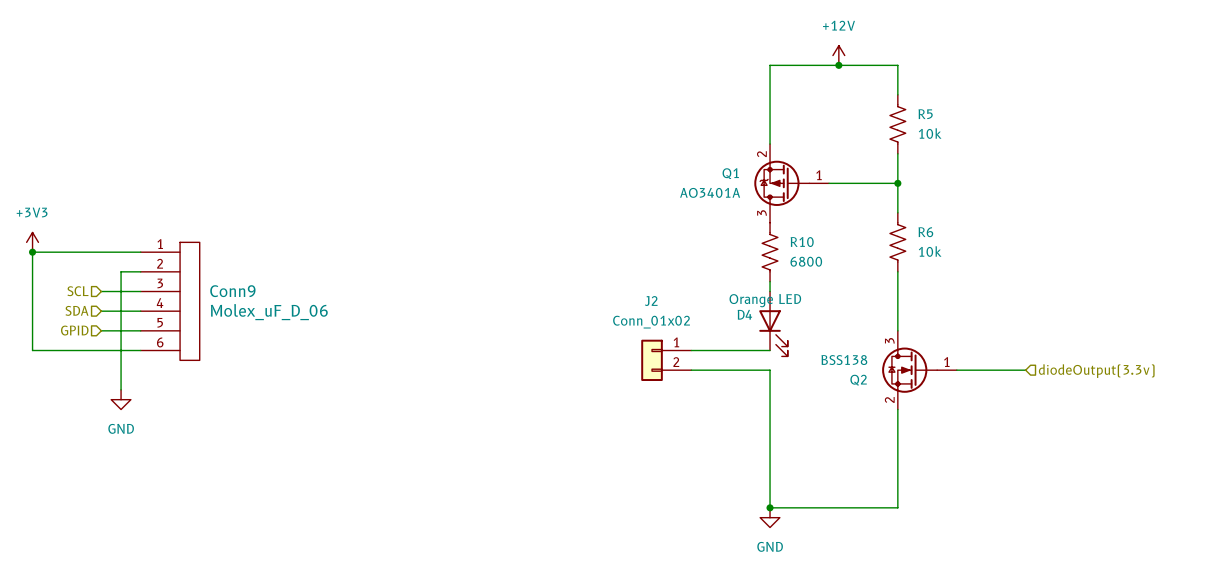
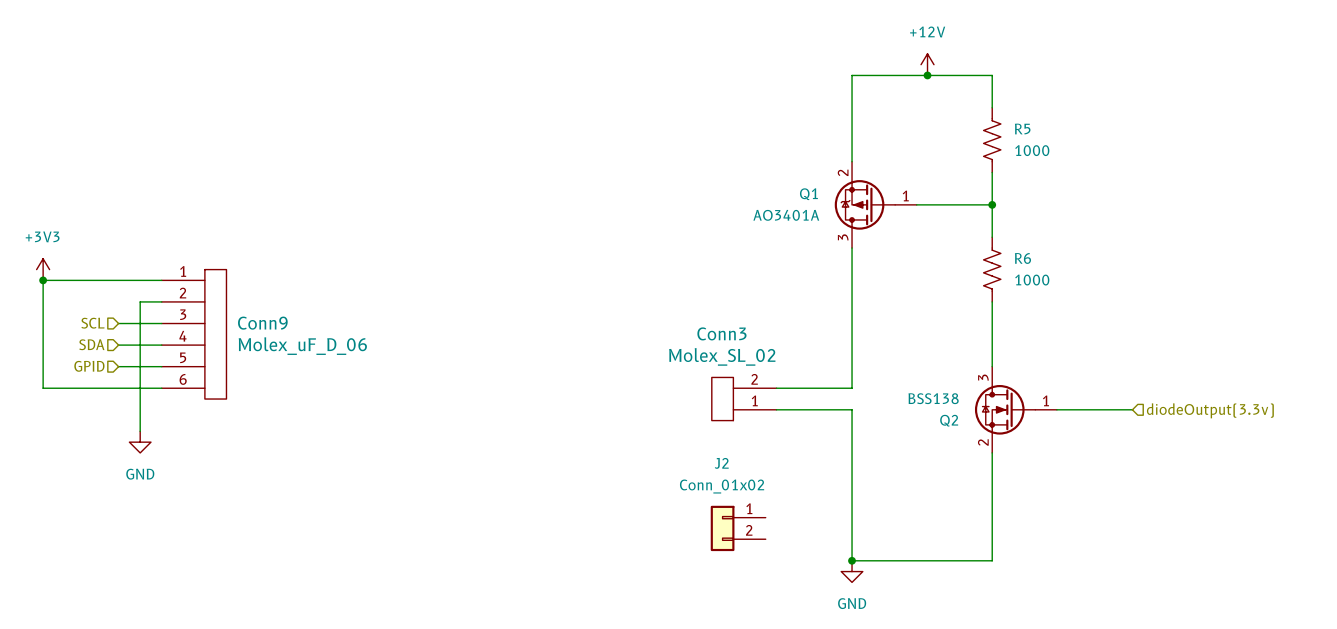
R5 value: 10k (930, 133) -> 1000 (1032, 150)
R6 value: 10k (930, 251) -> 1000 (1032, 280)
R10: 6800 (770, 252) -> none
D4: Orange LED (773, 323) -> none
J2 position: (666, 360) -> (738, 528)
Conn3: none -> Molex_SL_02 (744, 399)

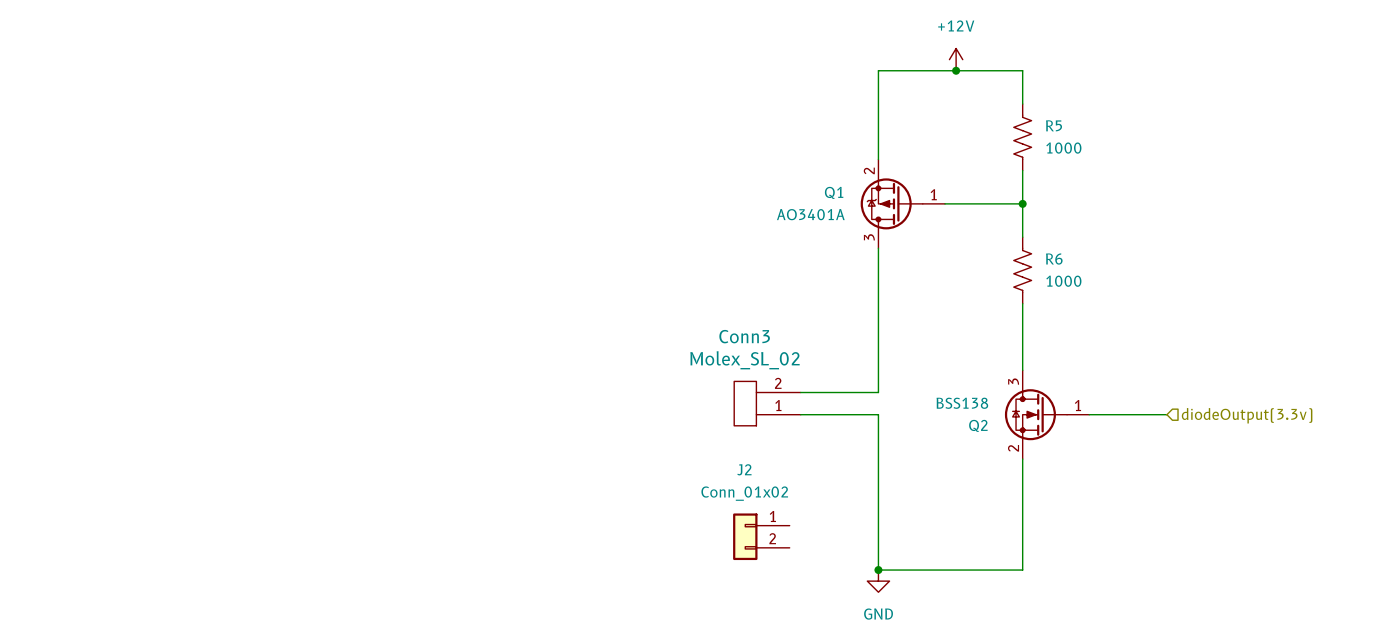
power symbol: +3V3 (43, 269) -> none
junction: (43, 280) -> none
wire: (161, 280) (43, 280) (43, 388) (161, 388) -> none
wire: (161, 301) (140, 301) (140, 431) -> none
hierarchical label: SCL (92, 323) -> none
wire: (118, 323) (161, 323) -> none
Conn9: Molex_uF_D_06 (194, 334) -> none
hierarchical label: SDA (91, 344) -> none
wire: (118, 345) (161, 345) -> none
hierarchical label: GPID (89, 366) -> none
wire: (118, 366) (161, 366) -> none
power symbol: GND (140, 442) -> none

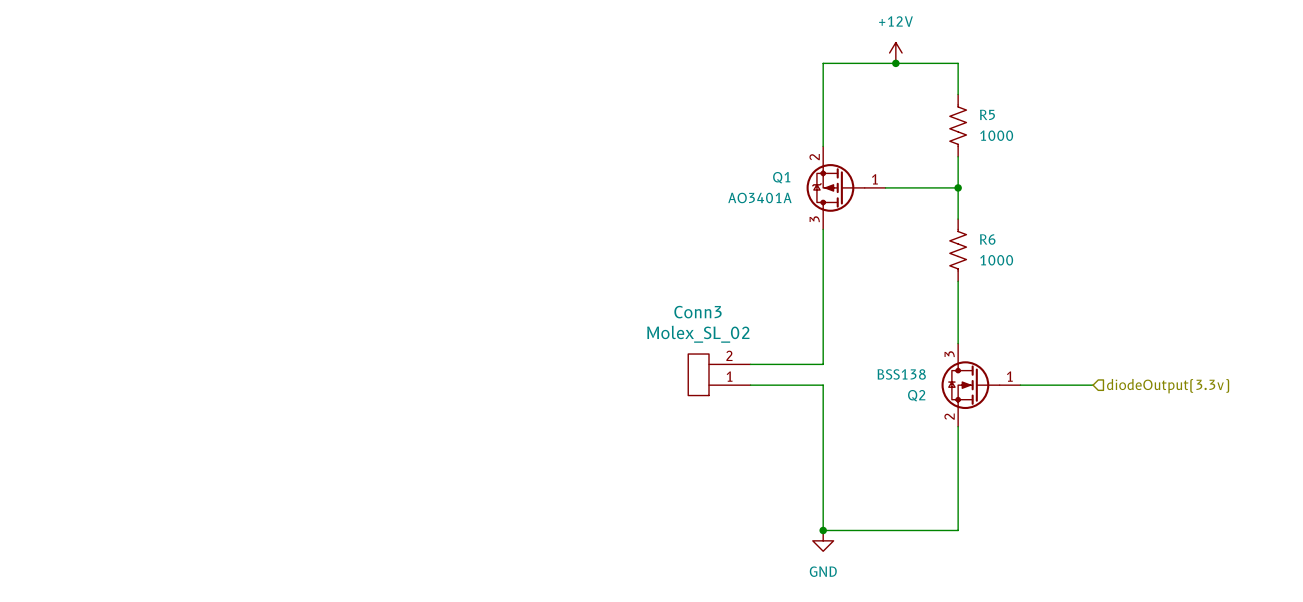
J2: Conn_01x02 (761, 536) -> none

